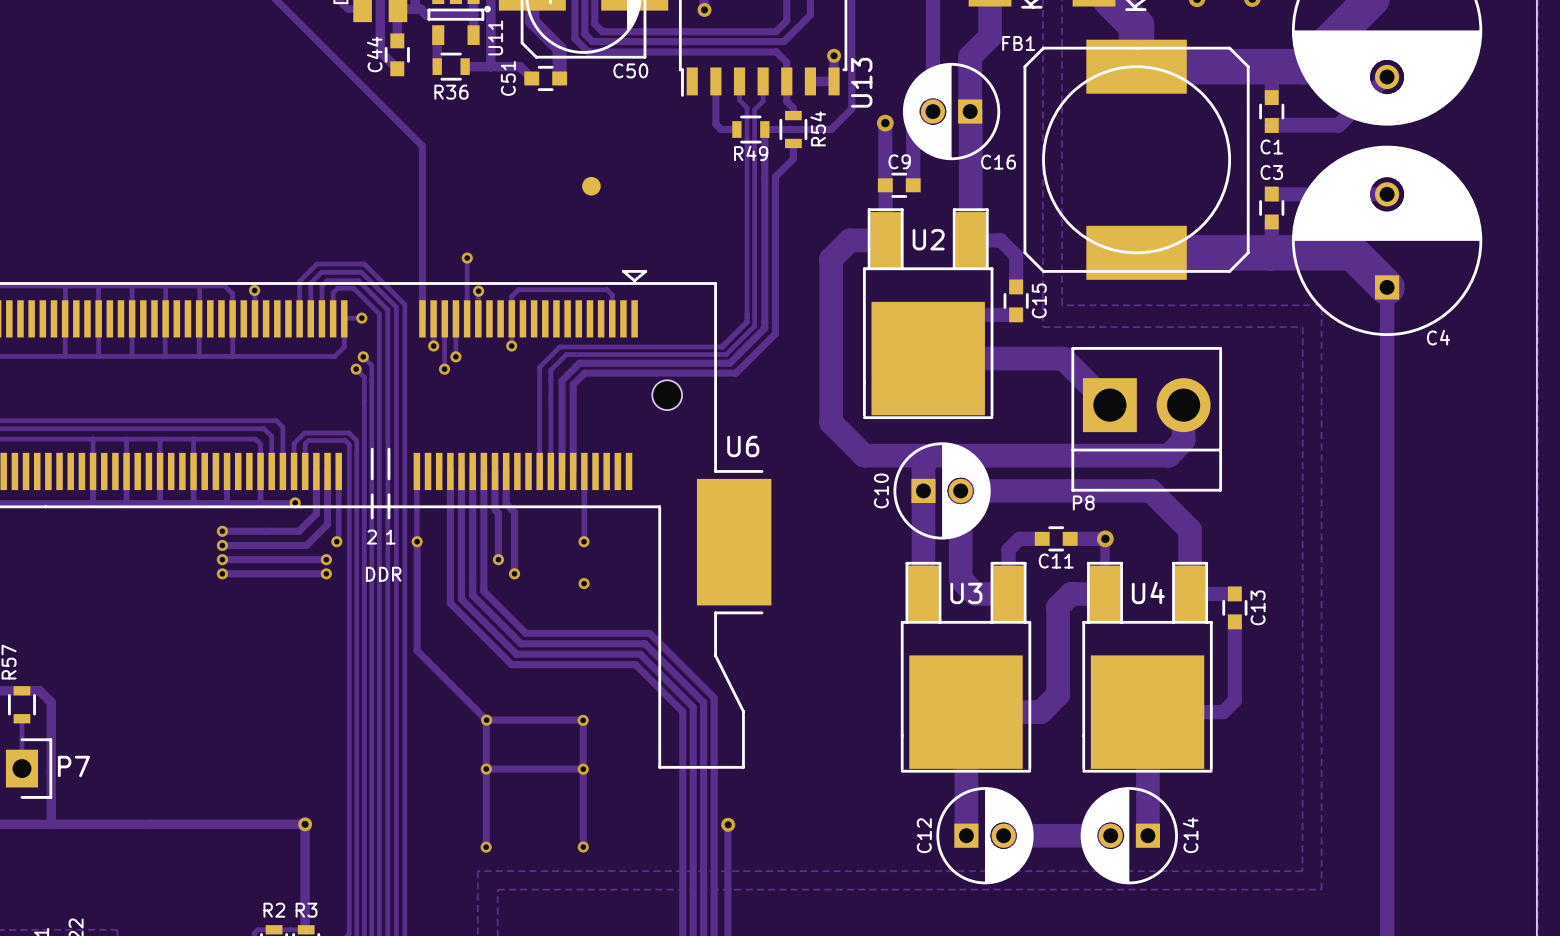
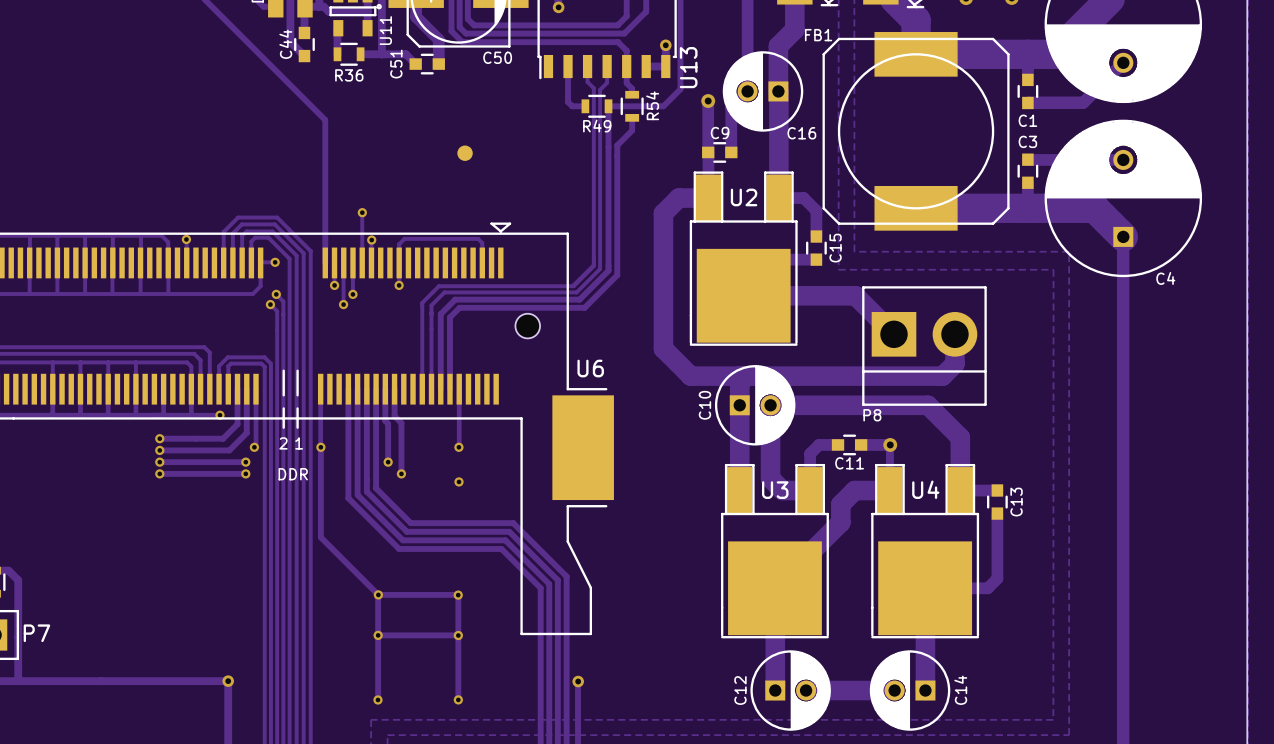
track: (1071, 593) (1058, 606) (1058, 694) (1040, 712) (966, 712) -> (861, 490) (854, 490) (840, 504) (840, 522) (751, 611)

